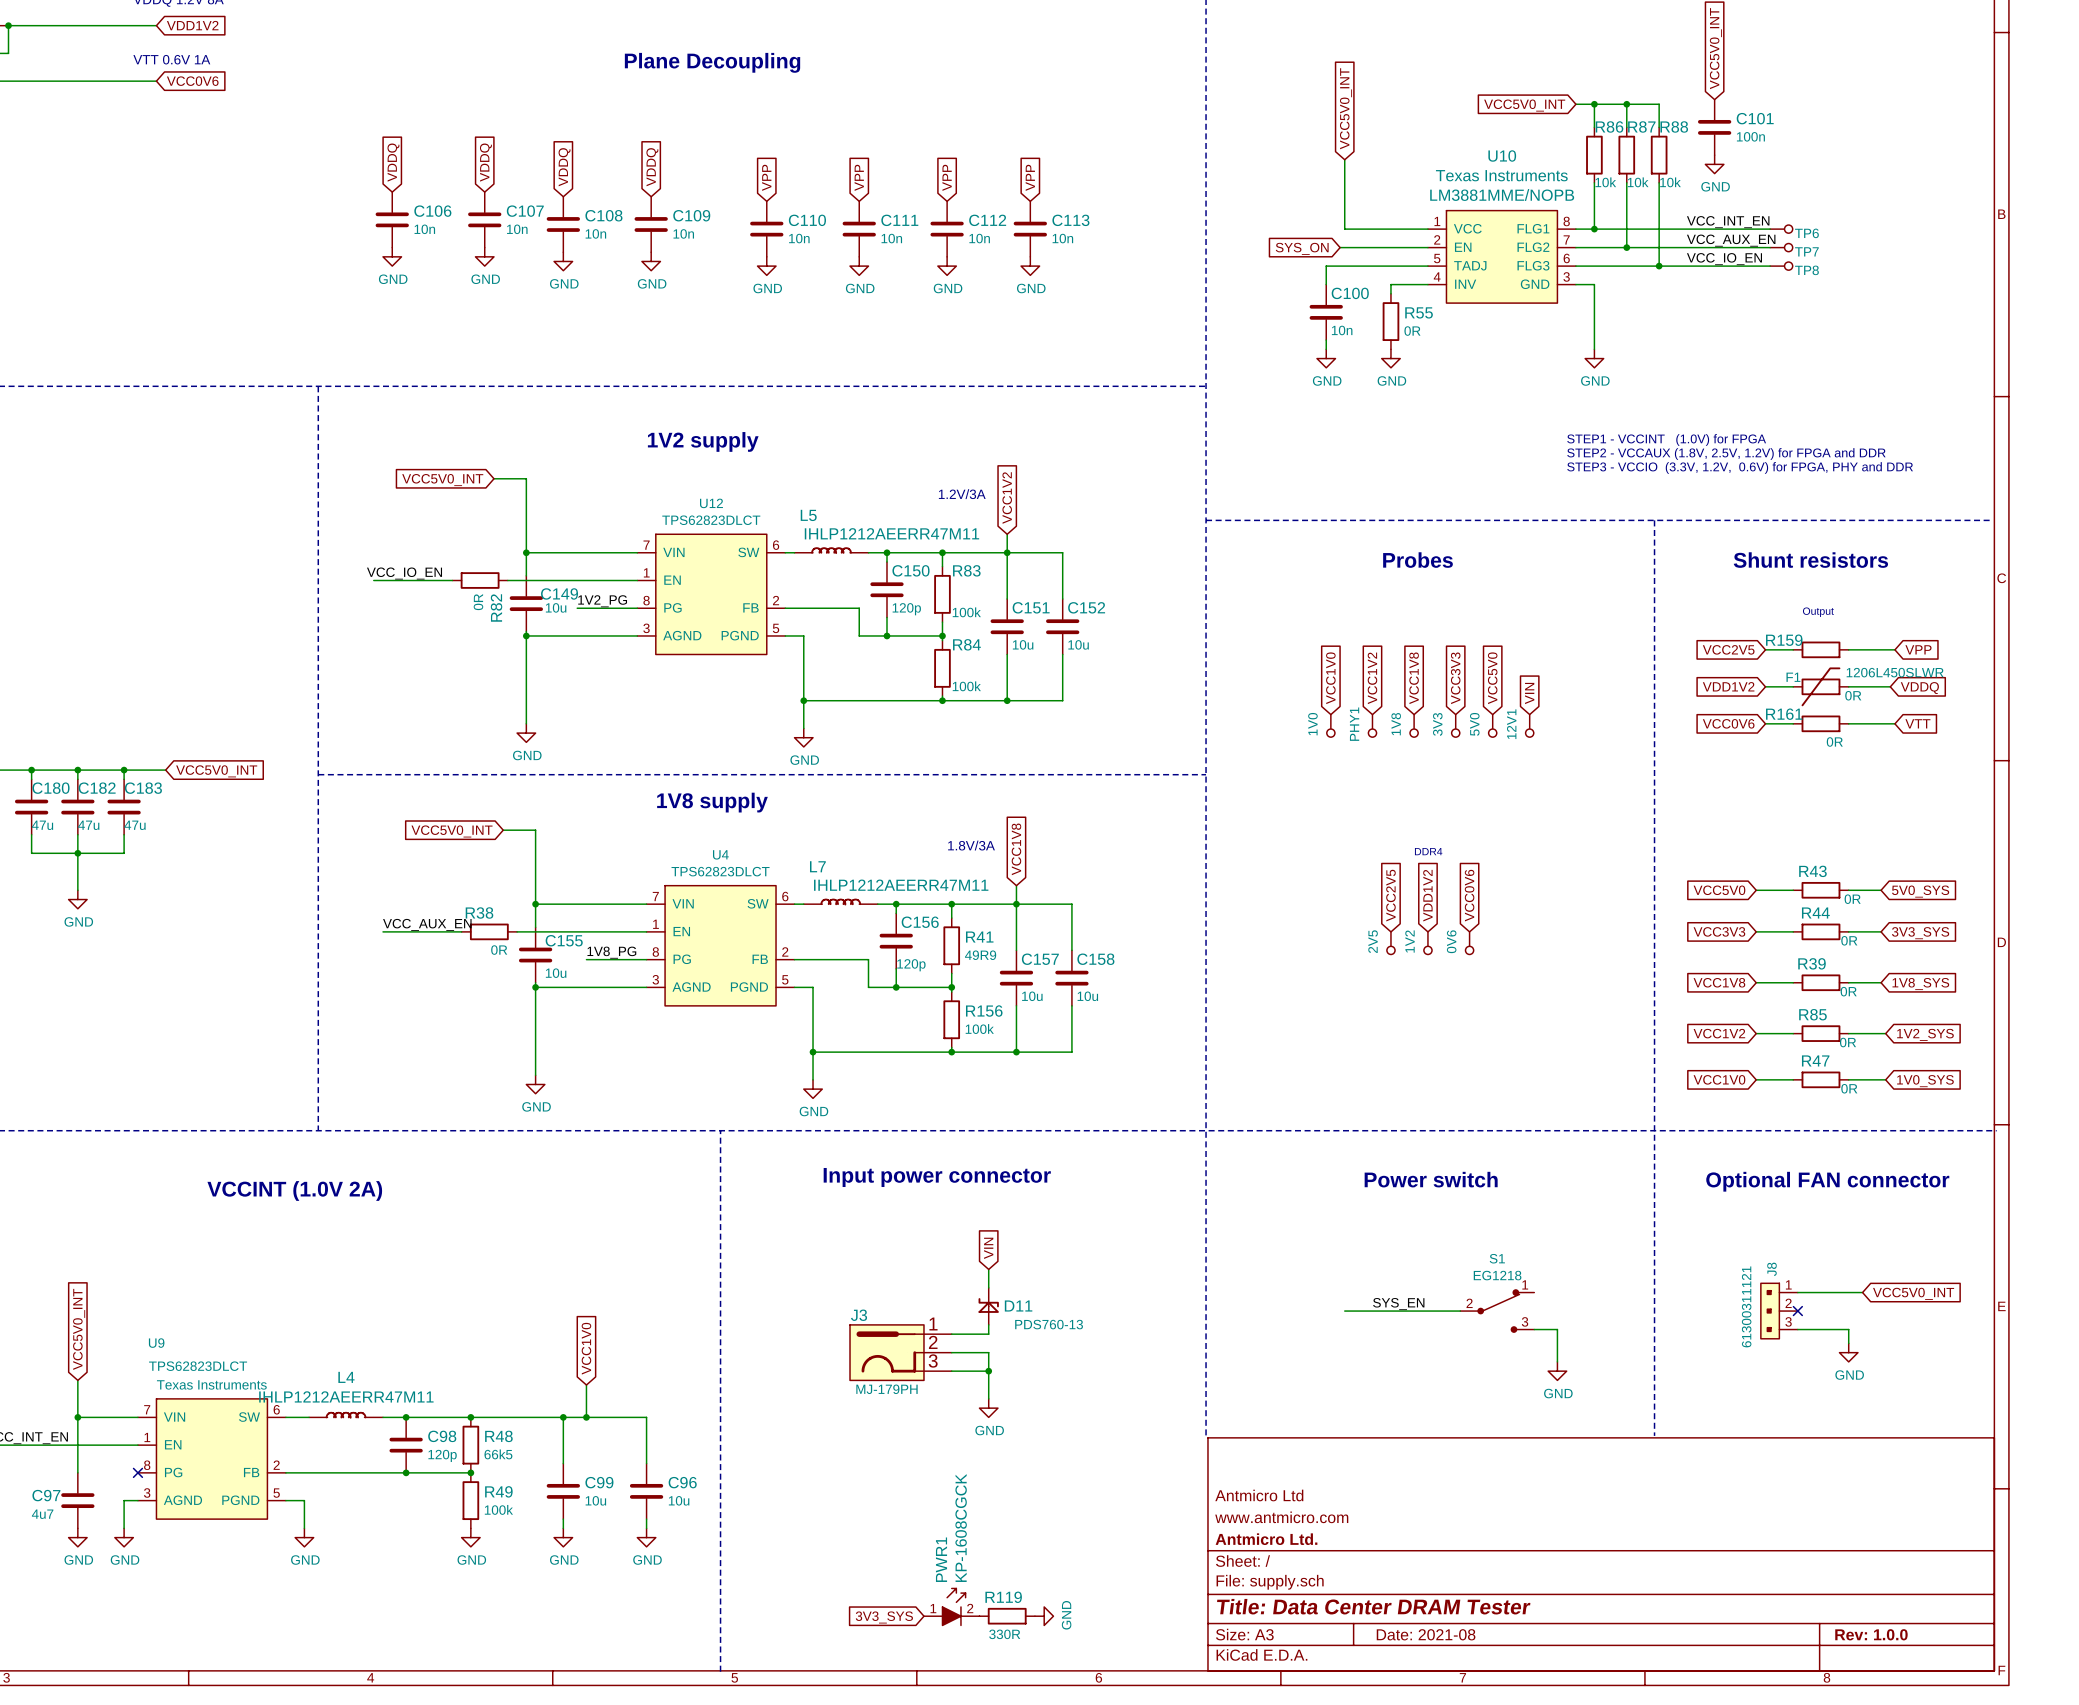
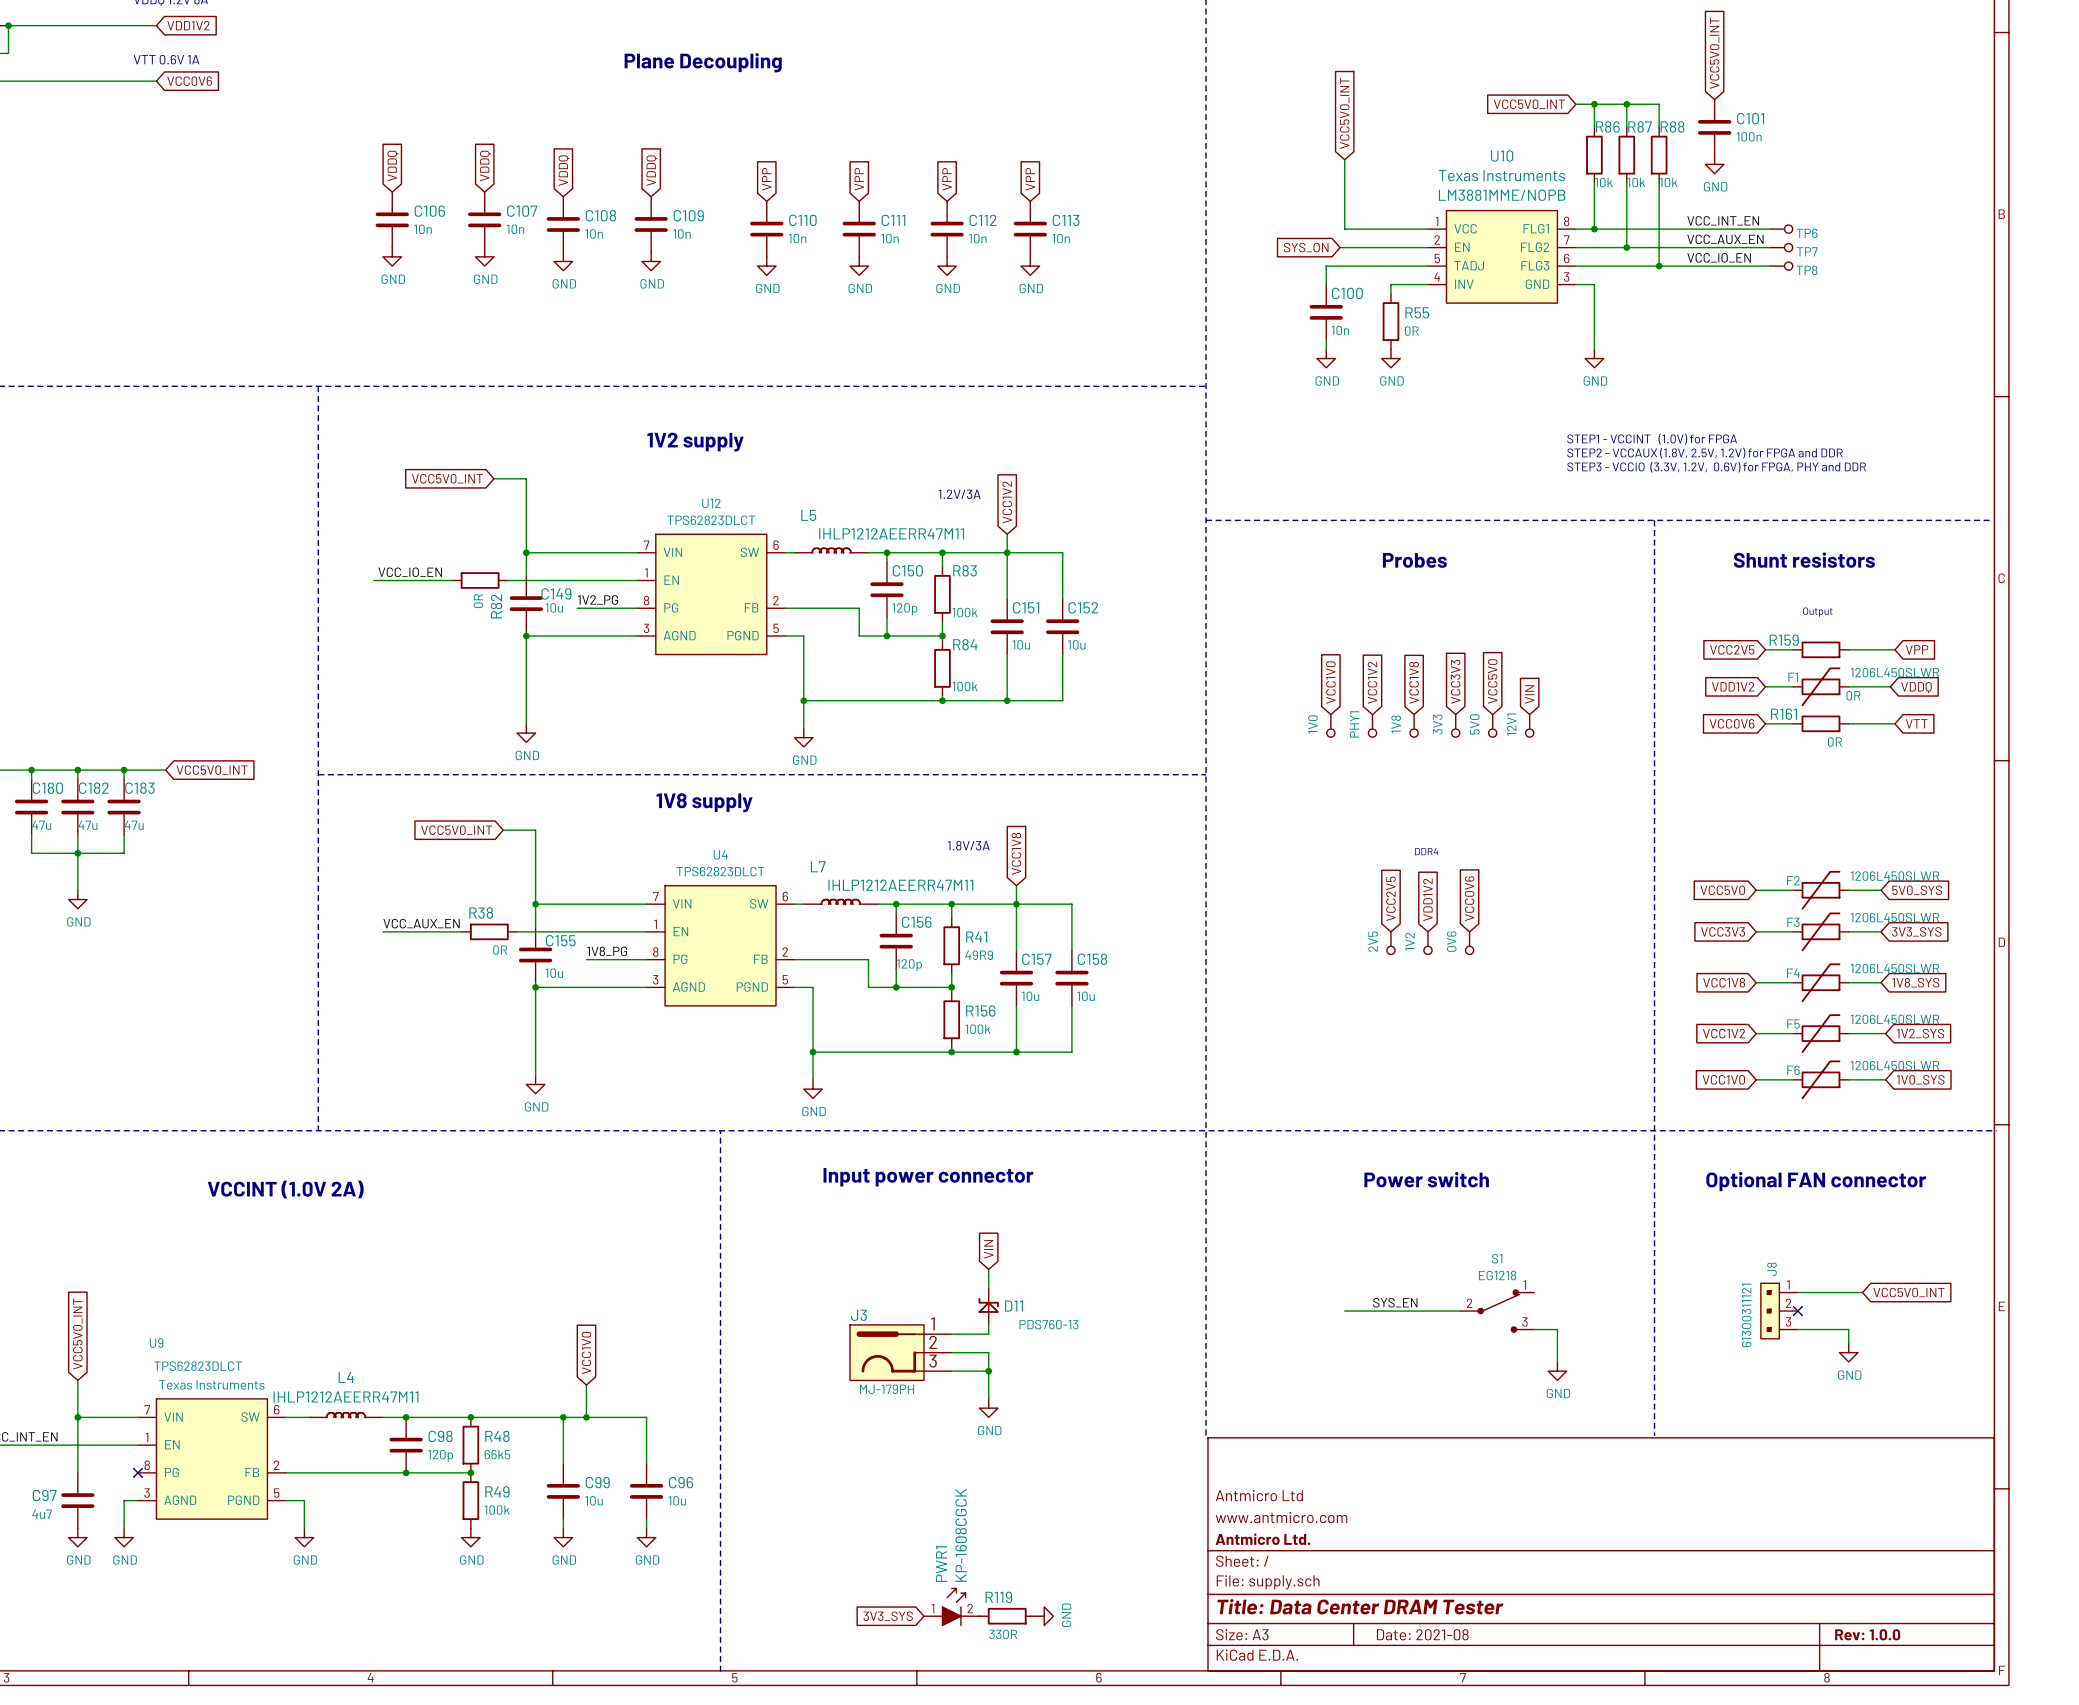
R43: (1820, 890) -> none
F2: none -> 1206L450SLWR (1820, 890)
R44: (1820, 931) -> none
F3: none -> 1206L450SLWR (1820, 931)
R39: (1820, 982) -> none
F4: none -> 1206L450SLWR (1820, 982)
R85: (1820, 1033) -> none
F5: none -> 1206L450SLWR (1820, 1033)
R47: (1820, 1079) -> none
F6: none -> 1206L450SLWR (1820, 1079)

